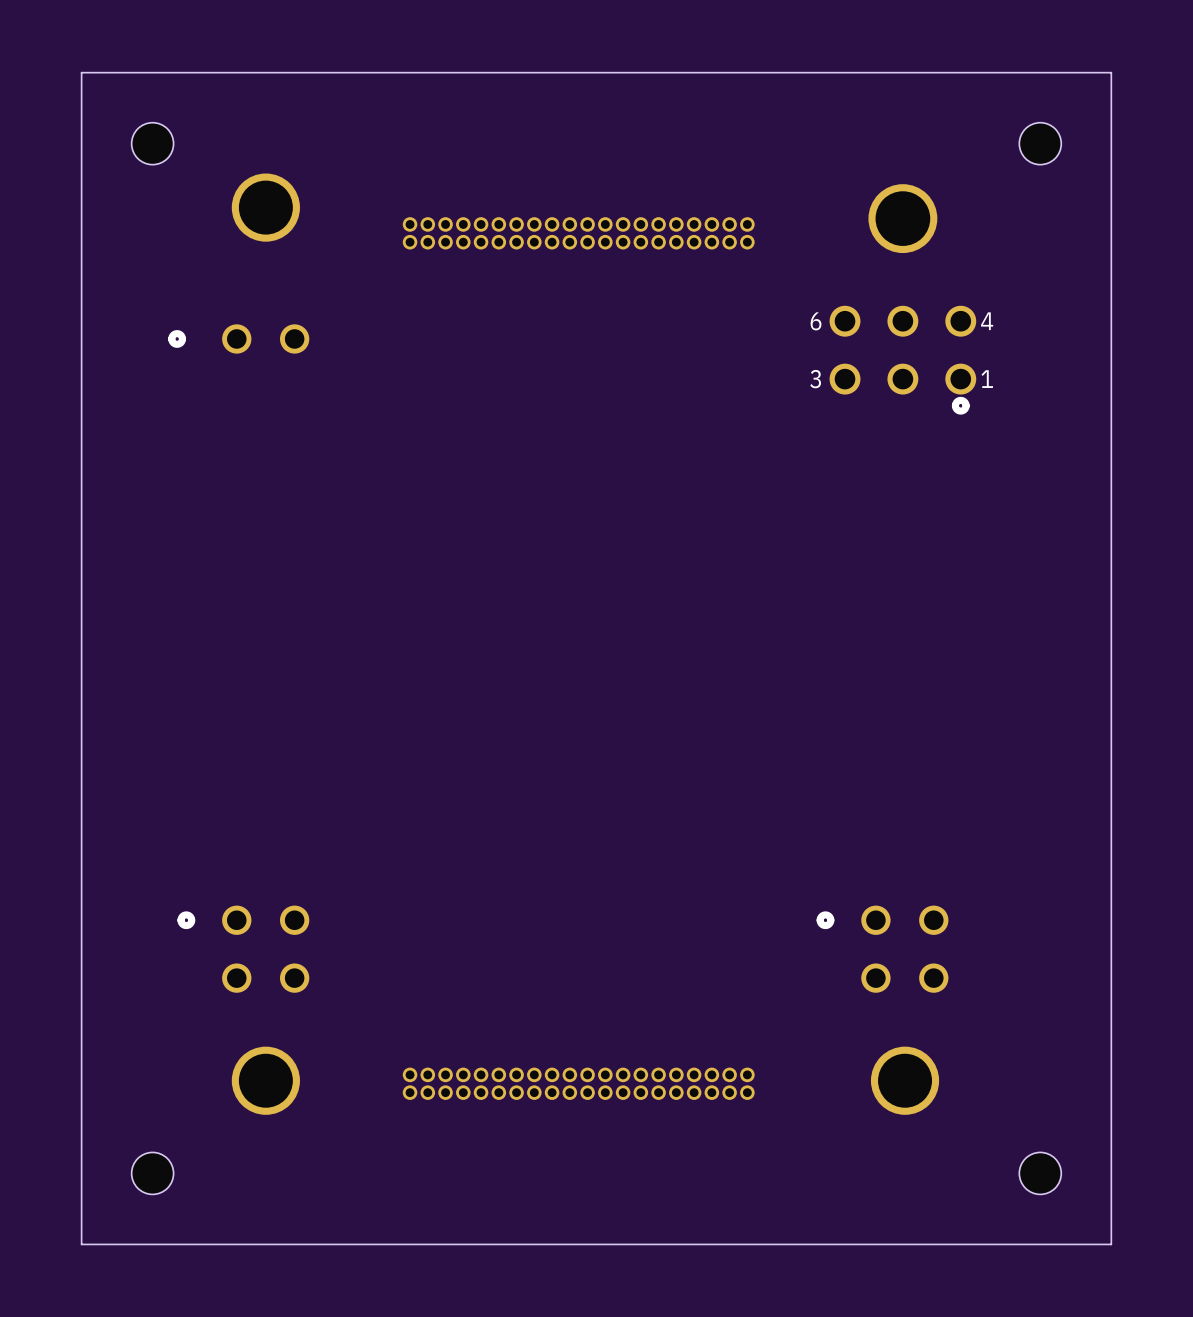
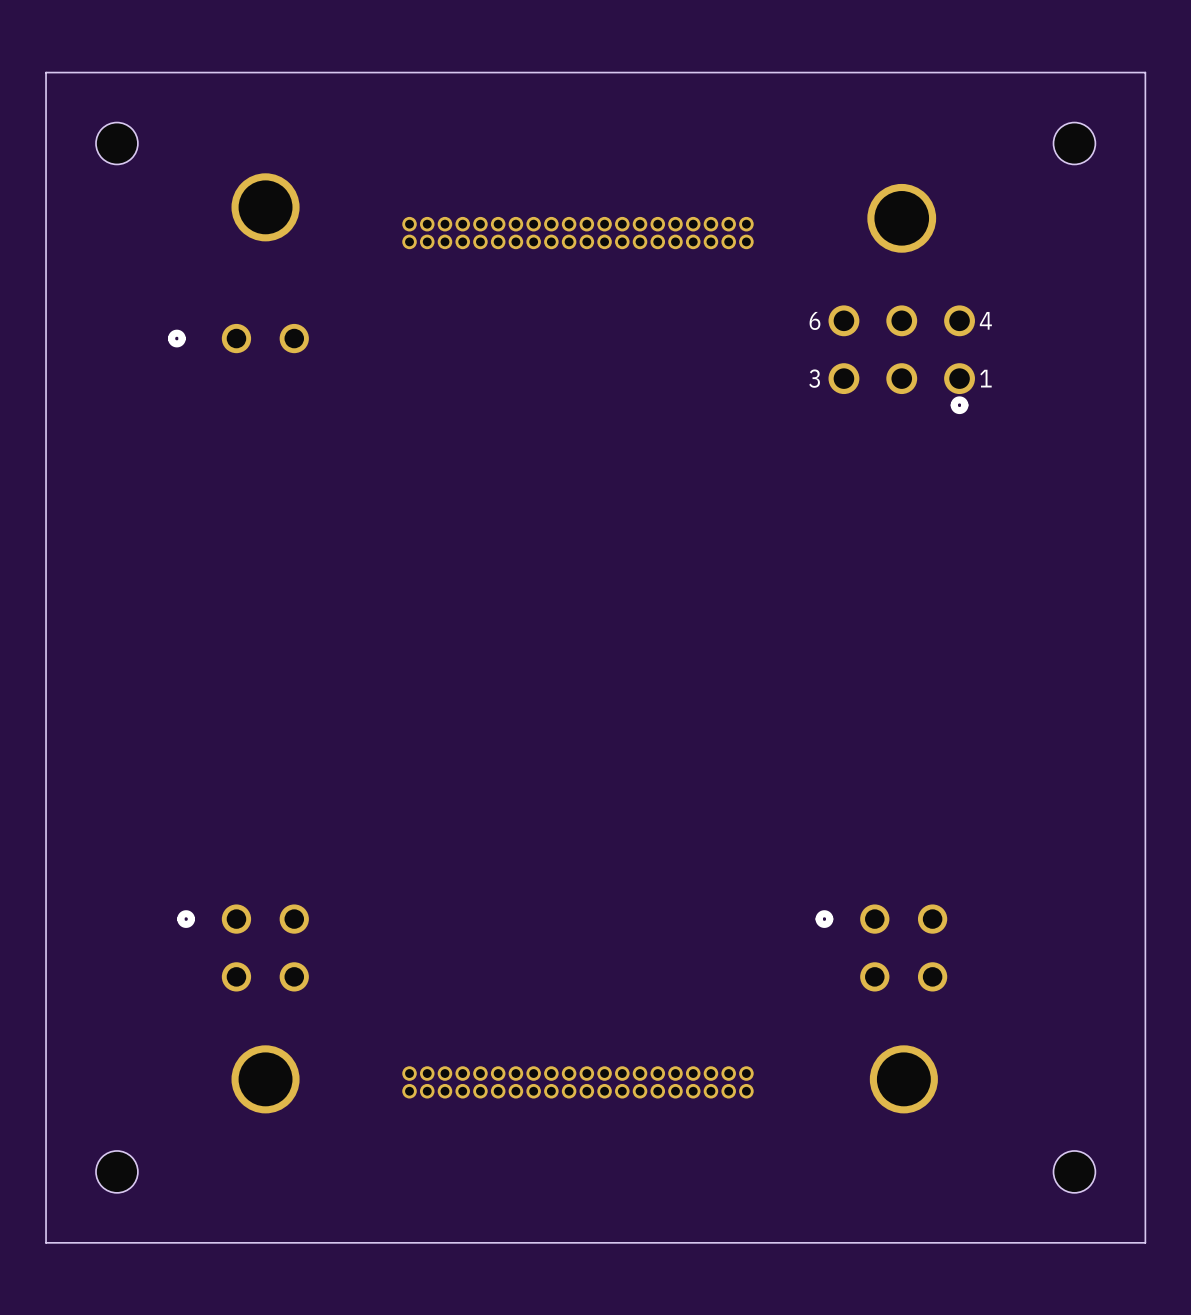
board edge: (81, 72) (81, 1244) -> (81, 72) (46, 72) (46, 1242) (81, 1242)
board edge: (1111, 72) (1111, 1244) -> (1109, 72) (1145, 72) (1145, 1242) (1109, 1242)
hole position: (152, 143) -> (116, 143)
hole position: (1040, 143) -> (1074, 143)
hole position: (152, 1173) -> (116, 1171)
hole position: (1040, 1173) -> (1074, 1171)

